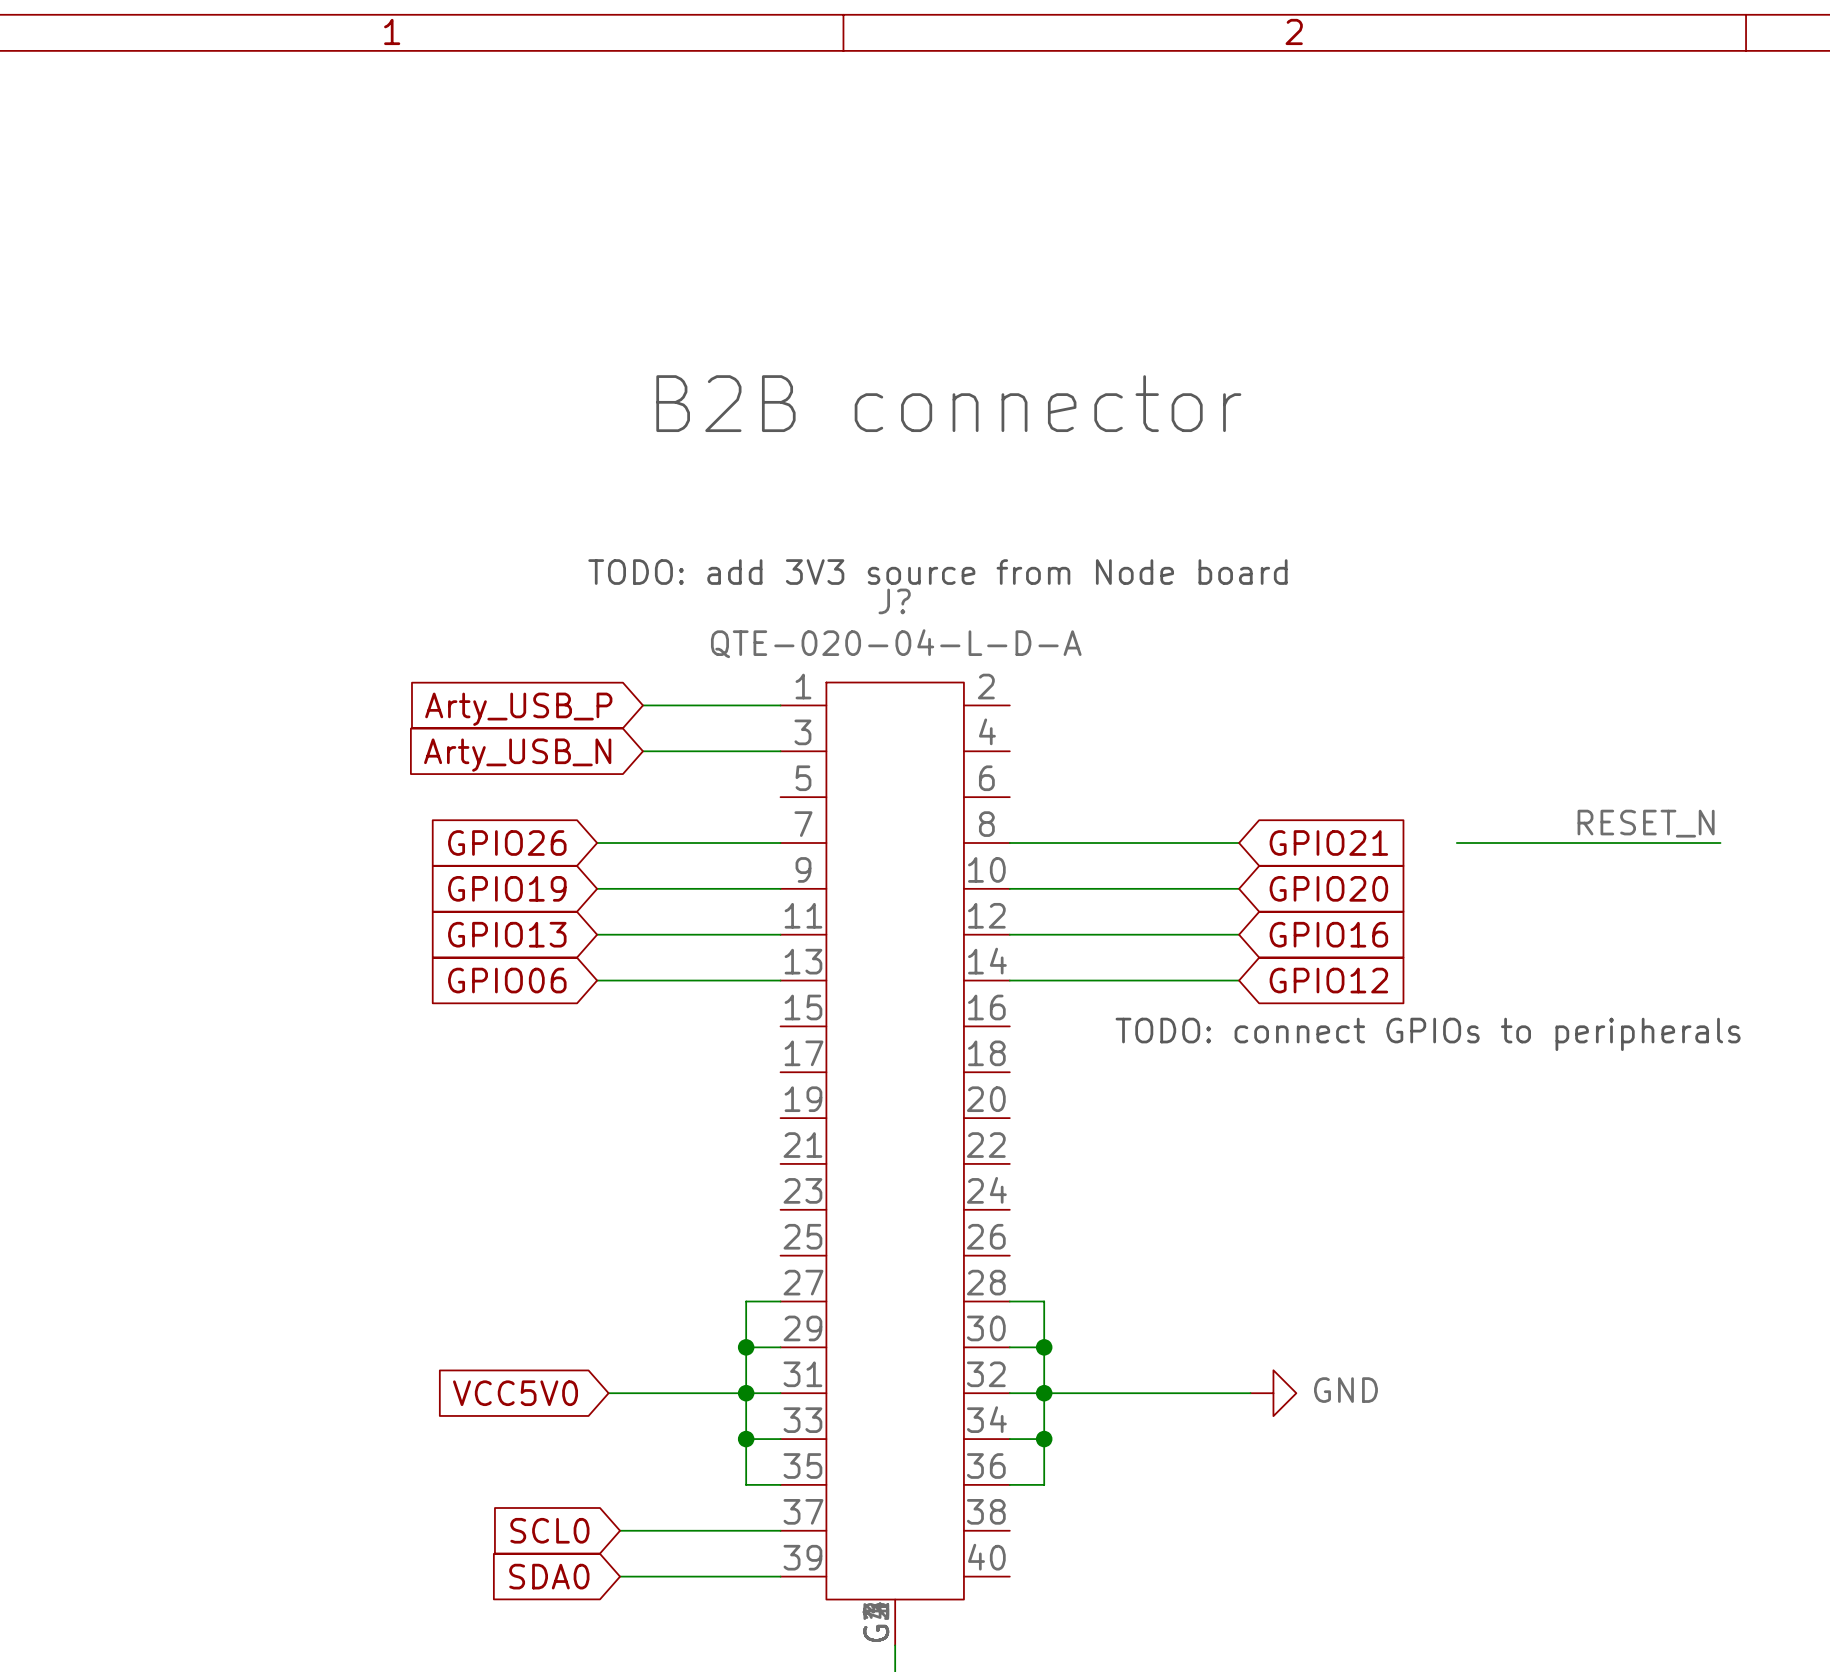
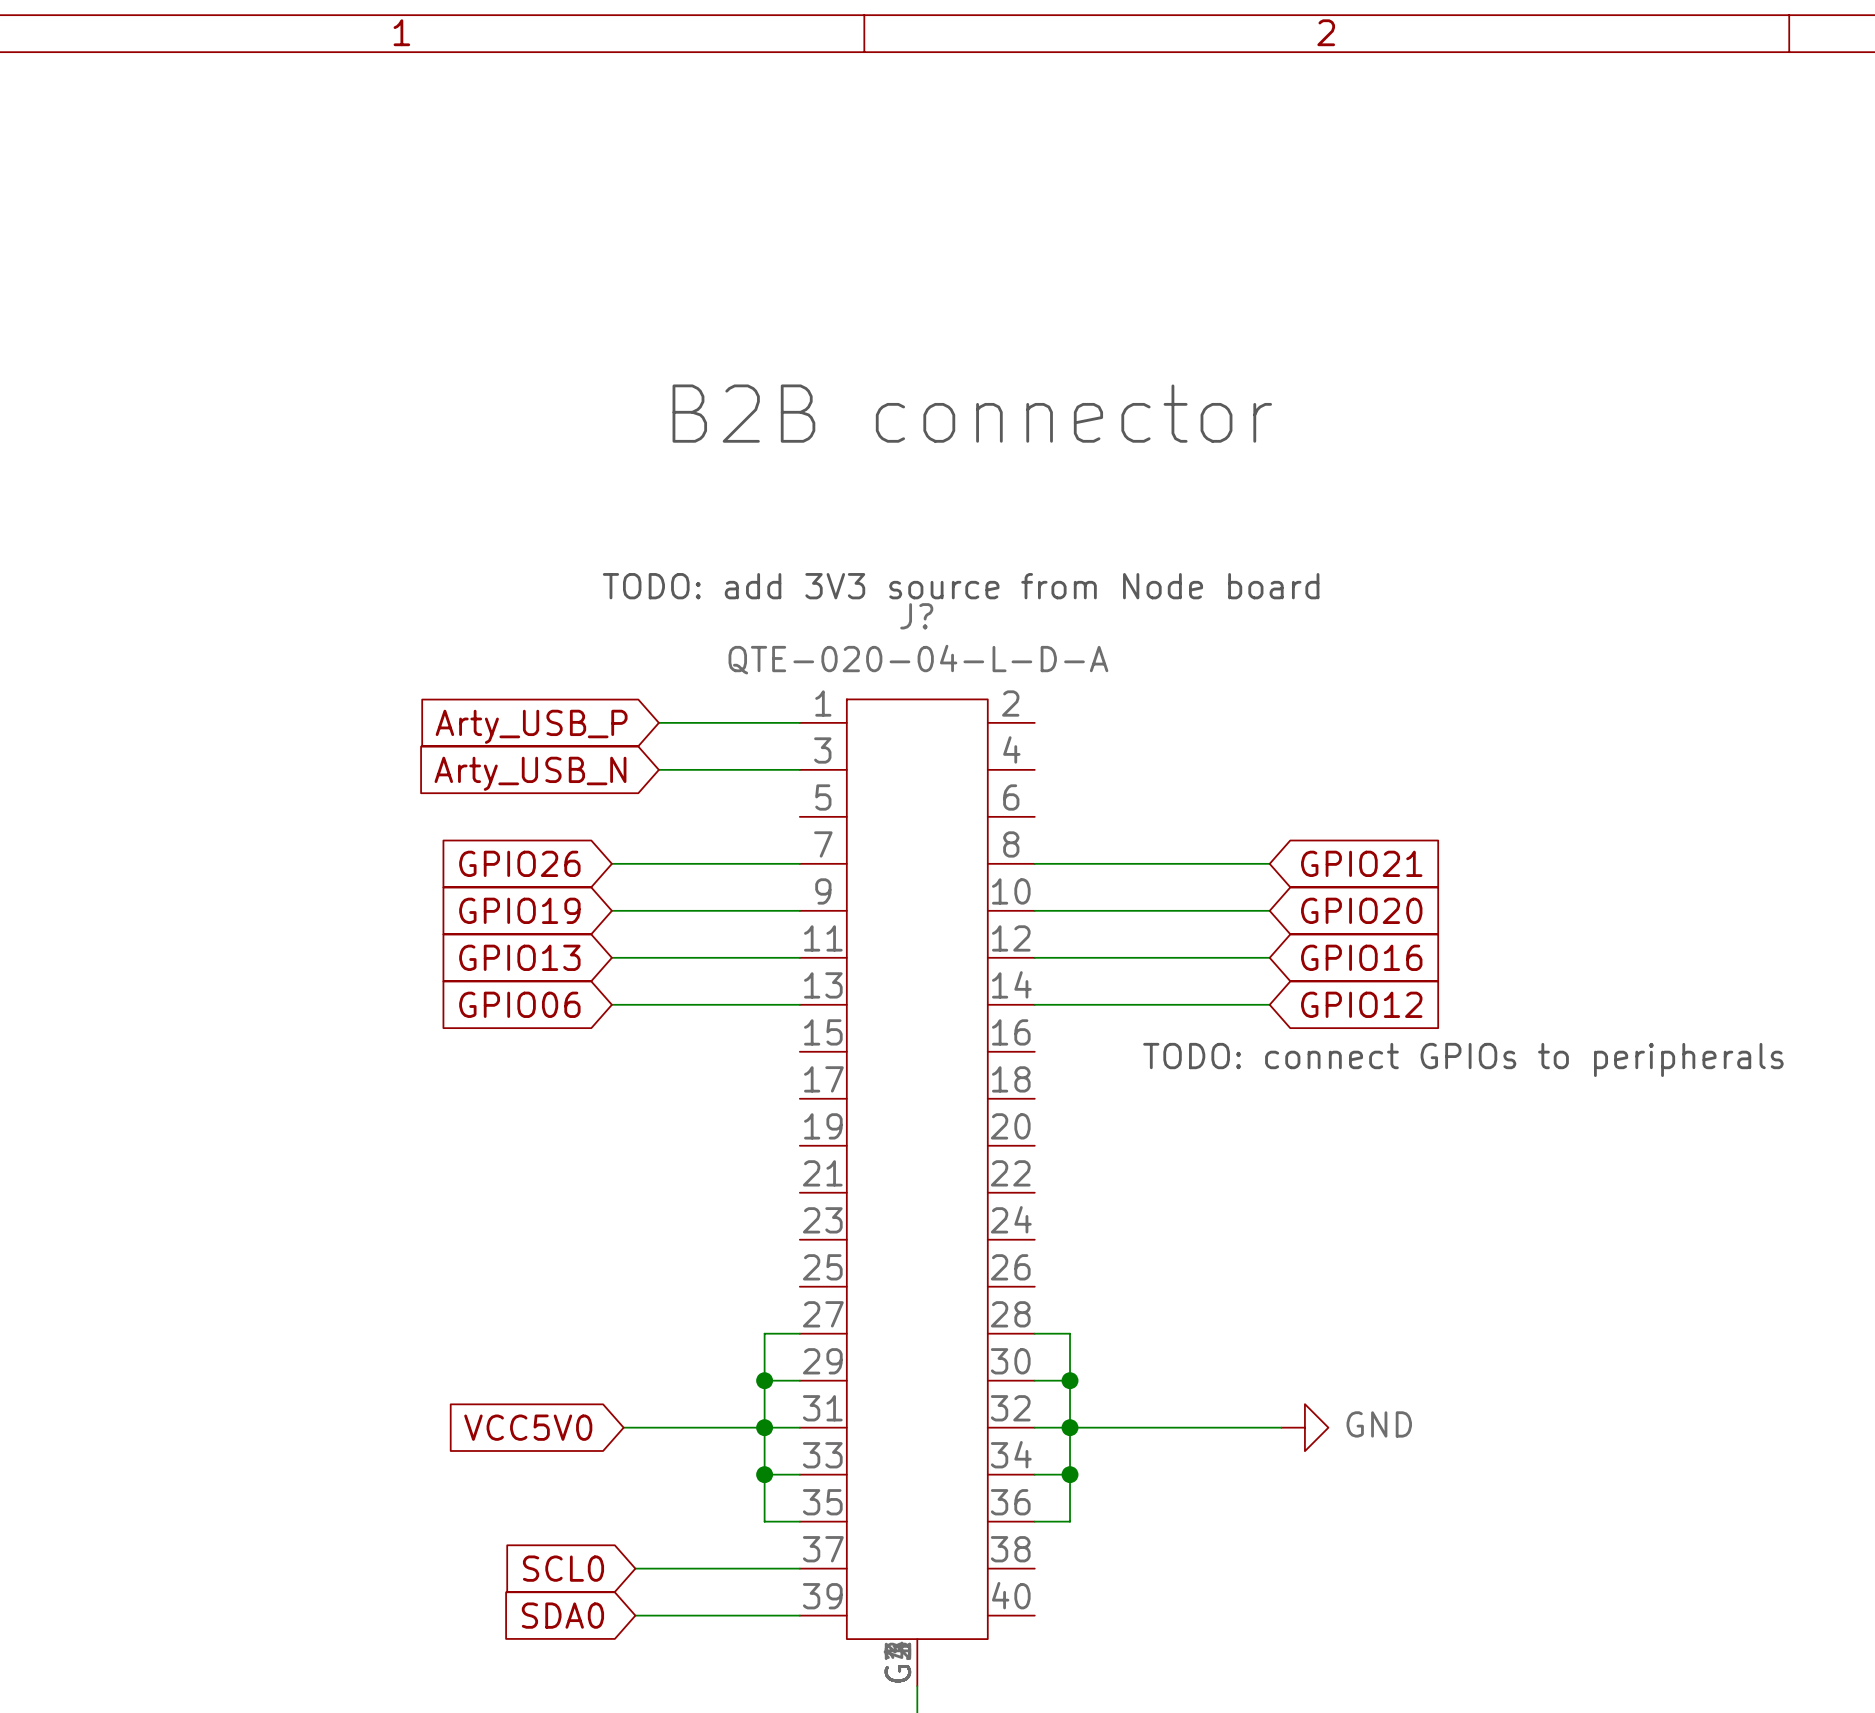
label: RESET_N (1646, 823) -> none
wire: (1456, 843) (1720, 843) -> none

